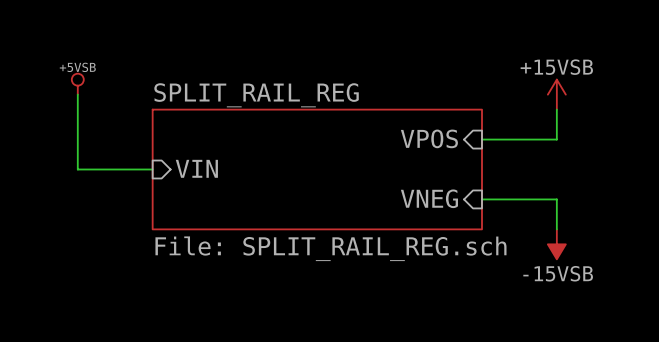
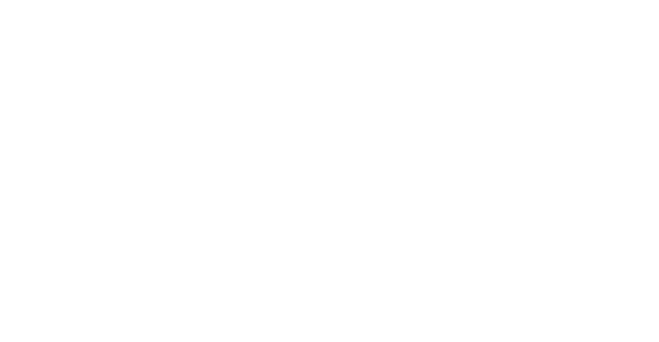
power symbol: +5VSB (77, 84) -> none
wire: (77, 94) (77, 169) (152, 169) -> none
power symbol: +15VSB (556, 94) -> none
wire: (556, 109) (556, 139) (482, 139) -> none
sheet pin: VPOS (429, 138) -> none
sheet pin: VIN (196, 168) -> none
sheet SPLIT_RAIL_REG: File: SPLIT_RAIL_REG.sch (317, 169) -> none
sheet pin: VNEG (429, 198) -> none
wire: (482, 199) (556, 199) (556, 229) -> none
power symbol: -15VSB (556, 244) -> none

